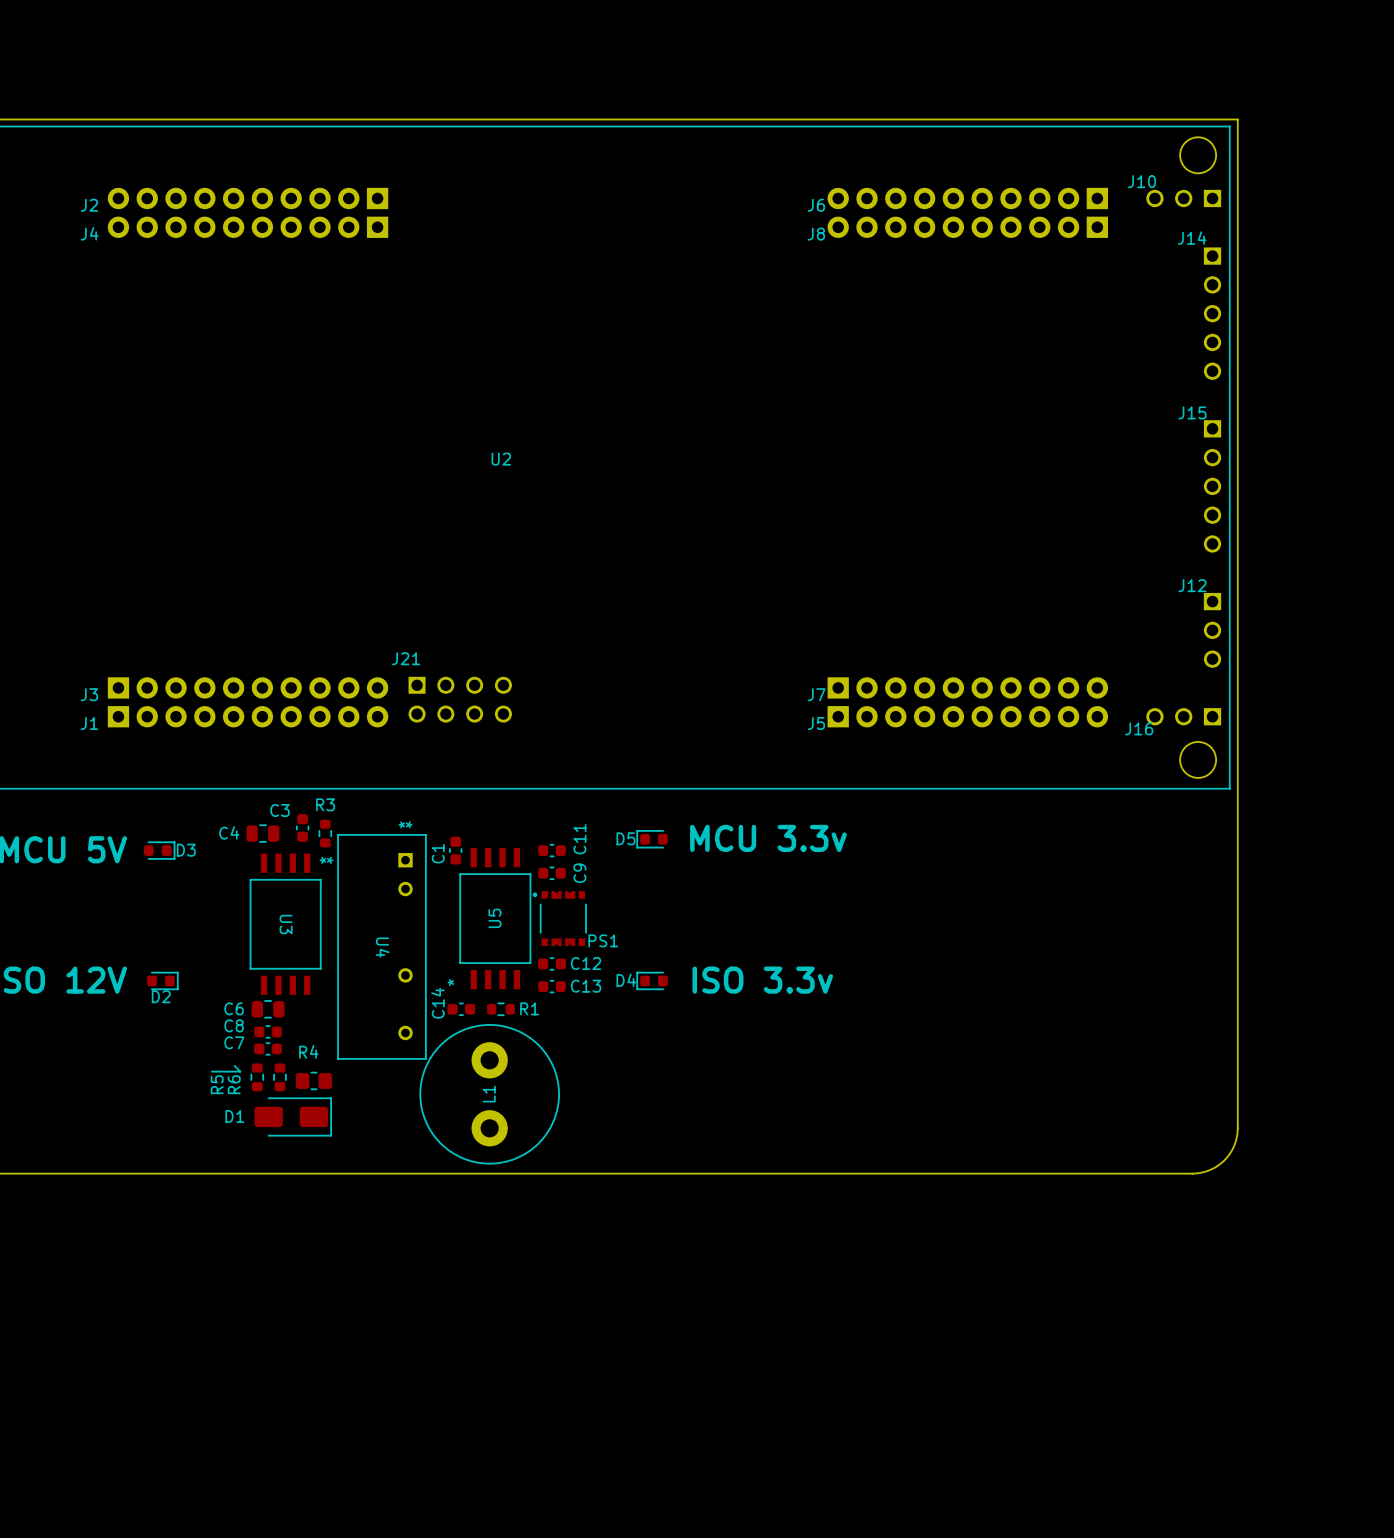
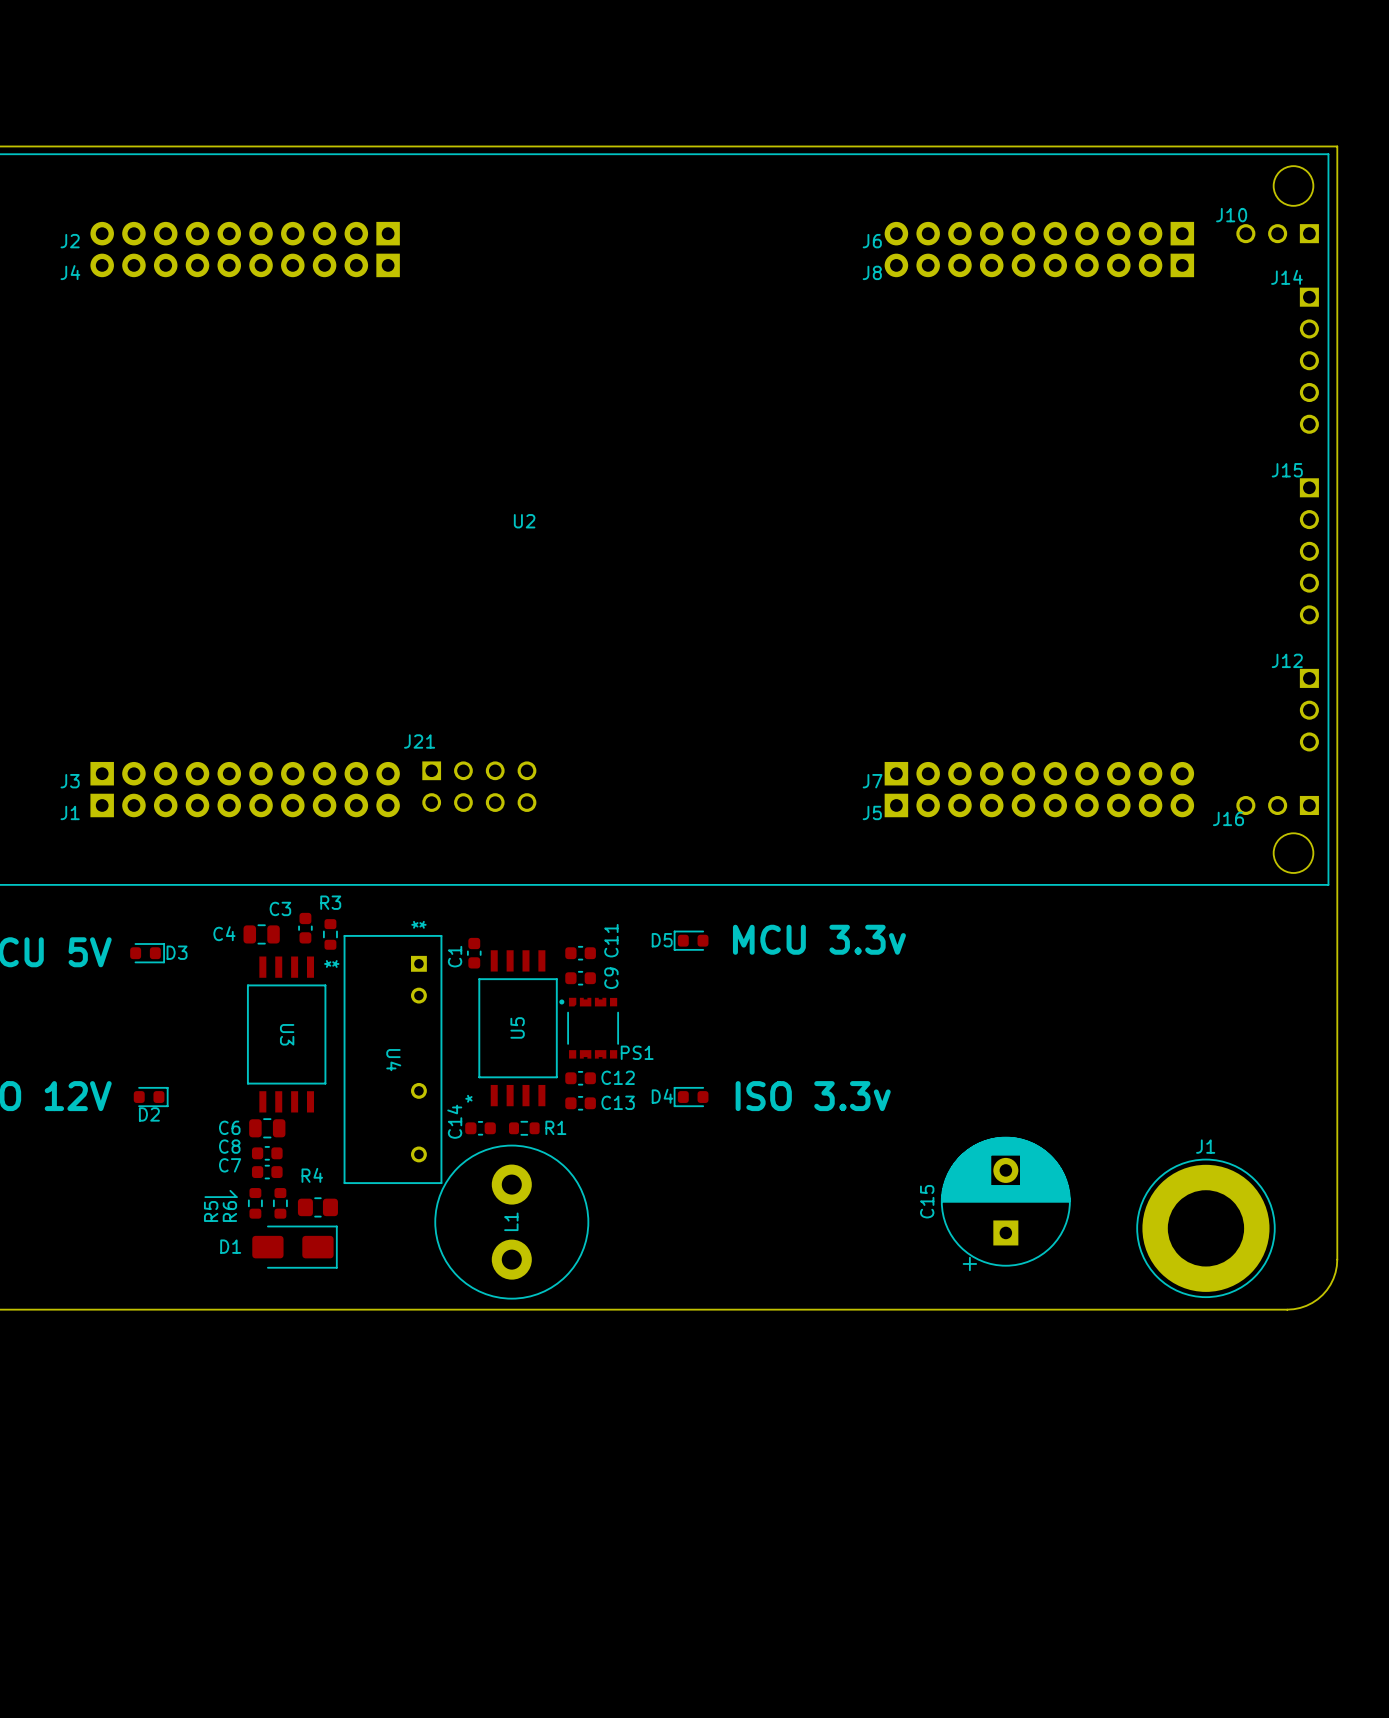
C15: none -> (1005, 1203)
J1: none -> (1205, 1228)

